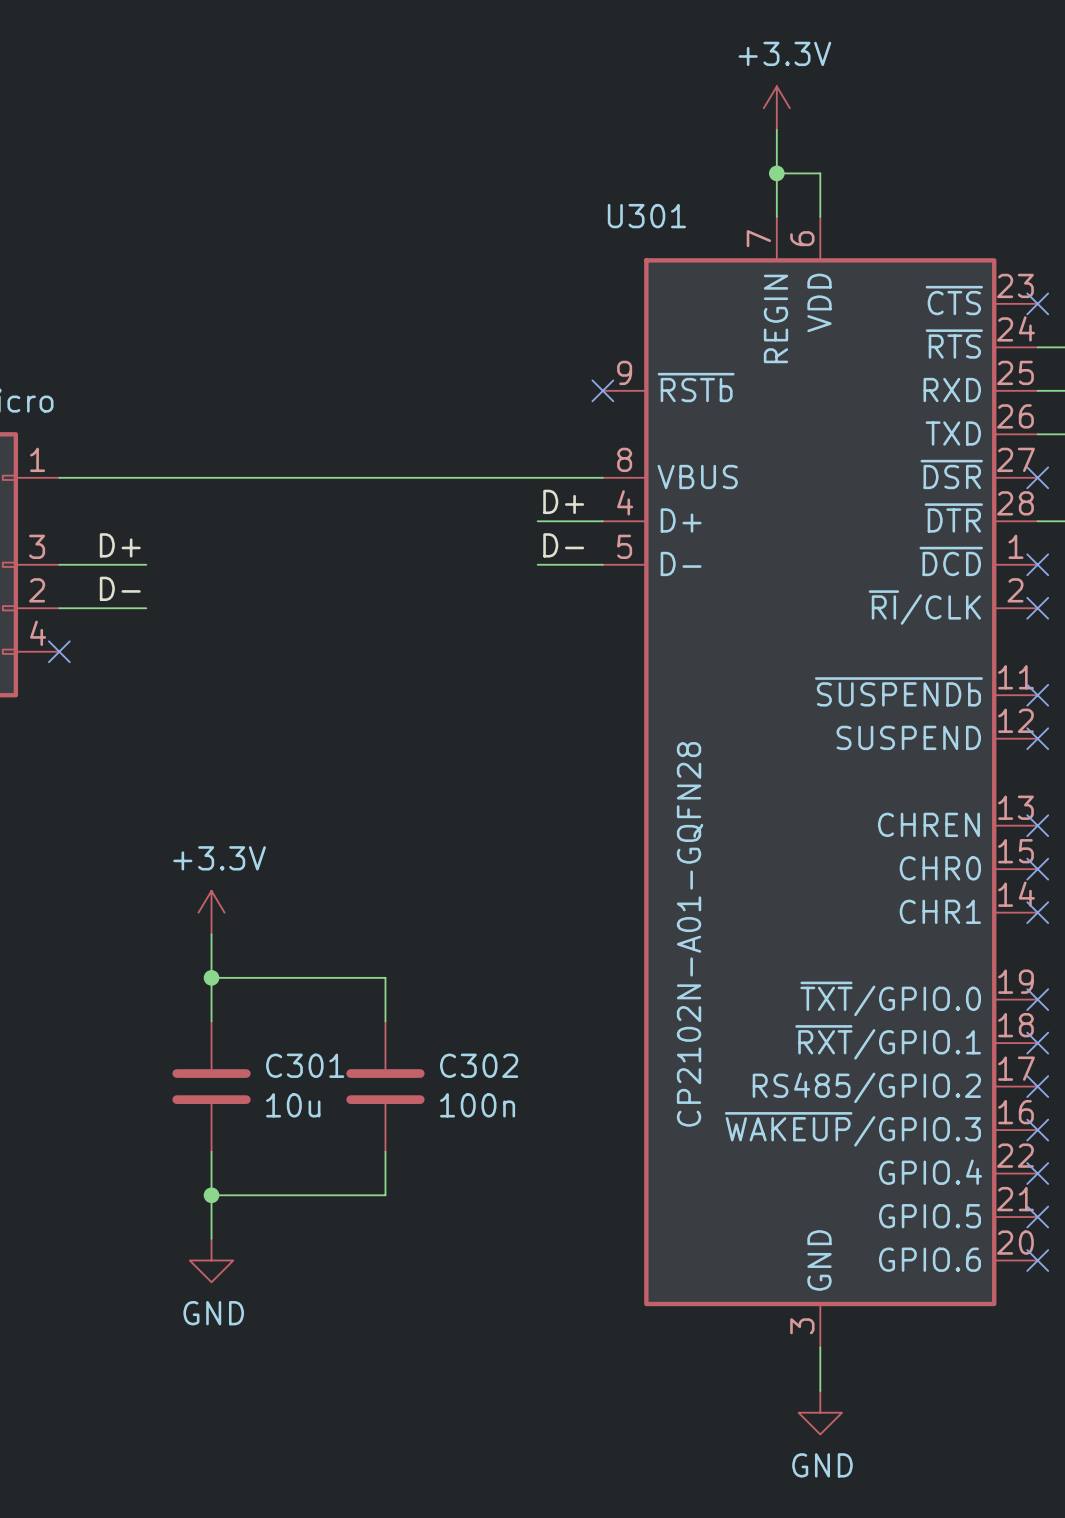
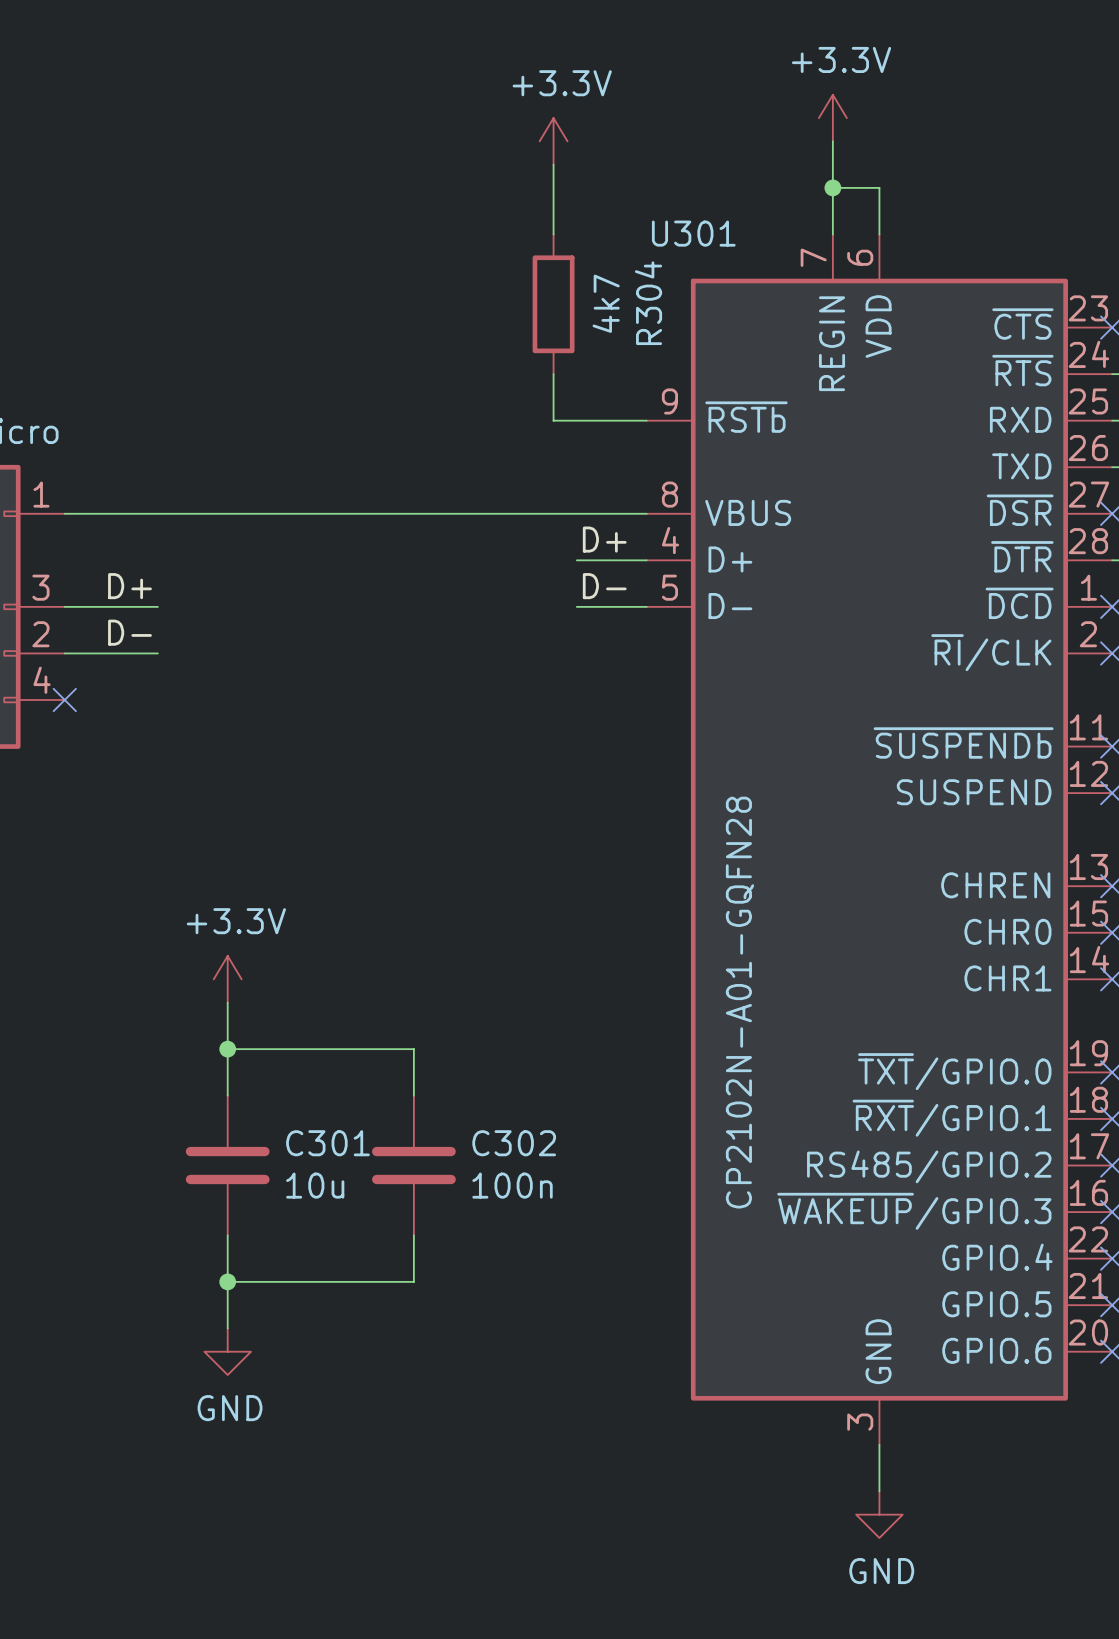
power symbol: none -> +3.3V (553, 141)
wire: none -> (553, 164) (553, 234)
R304: none -> 4k7 (553, 304)
wire: none -> (553, 374) (553, 420) (646, 420)
no-connect mark: (602, 390) -> none

